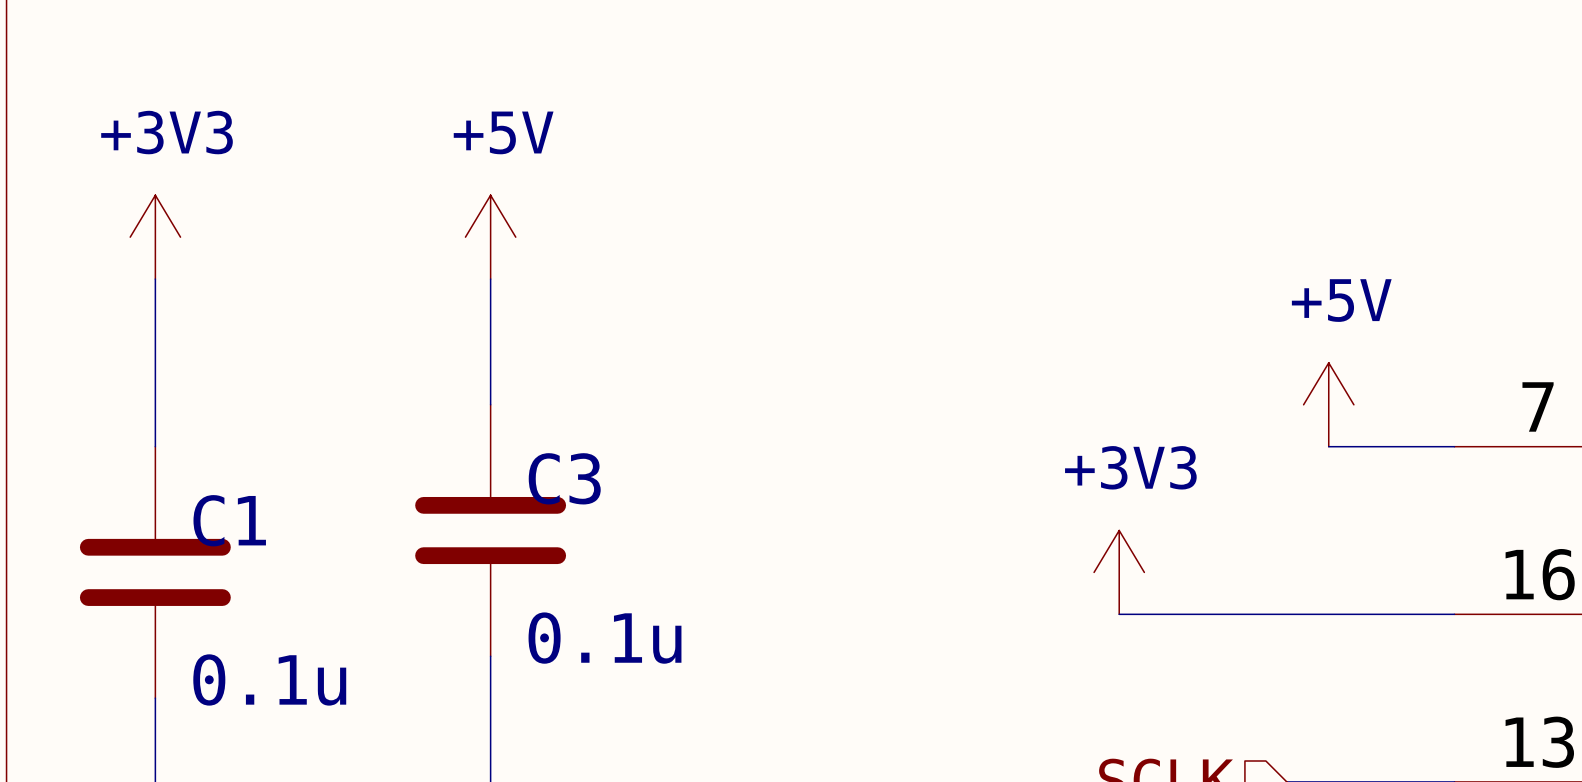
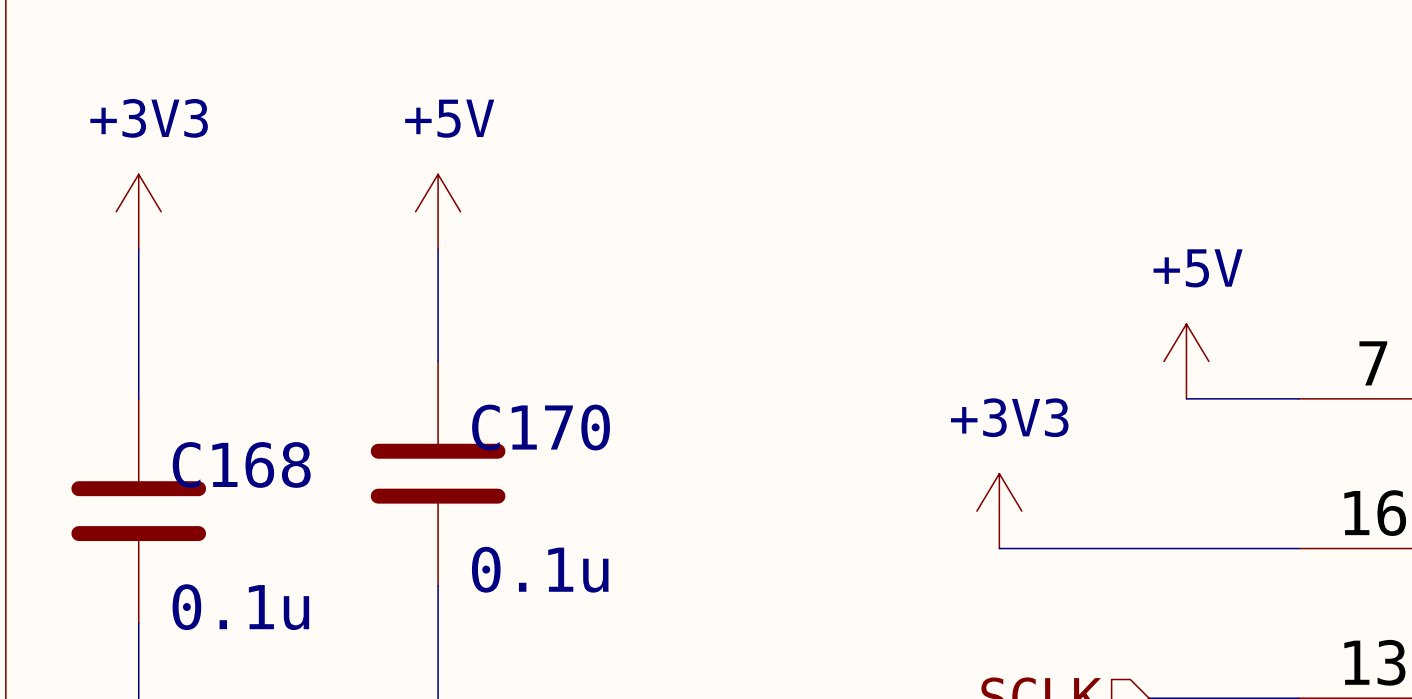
C3 name: C3 (564, 478) -> C170 (541, 427)
C1 name: C1 (229, 520) -> C168 (241, 464)

